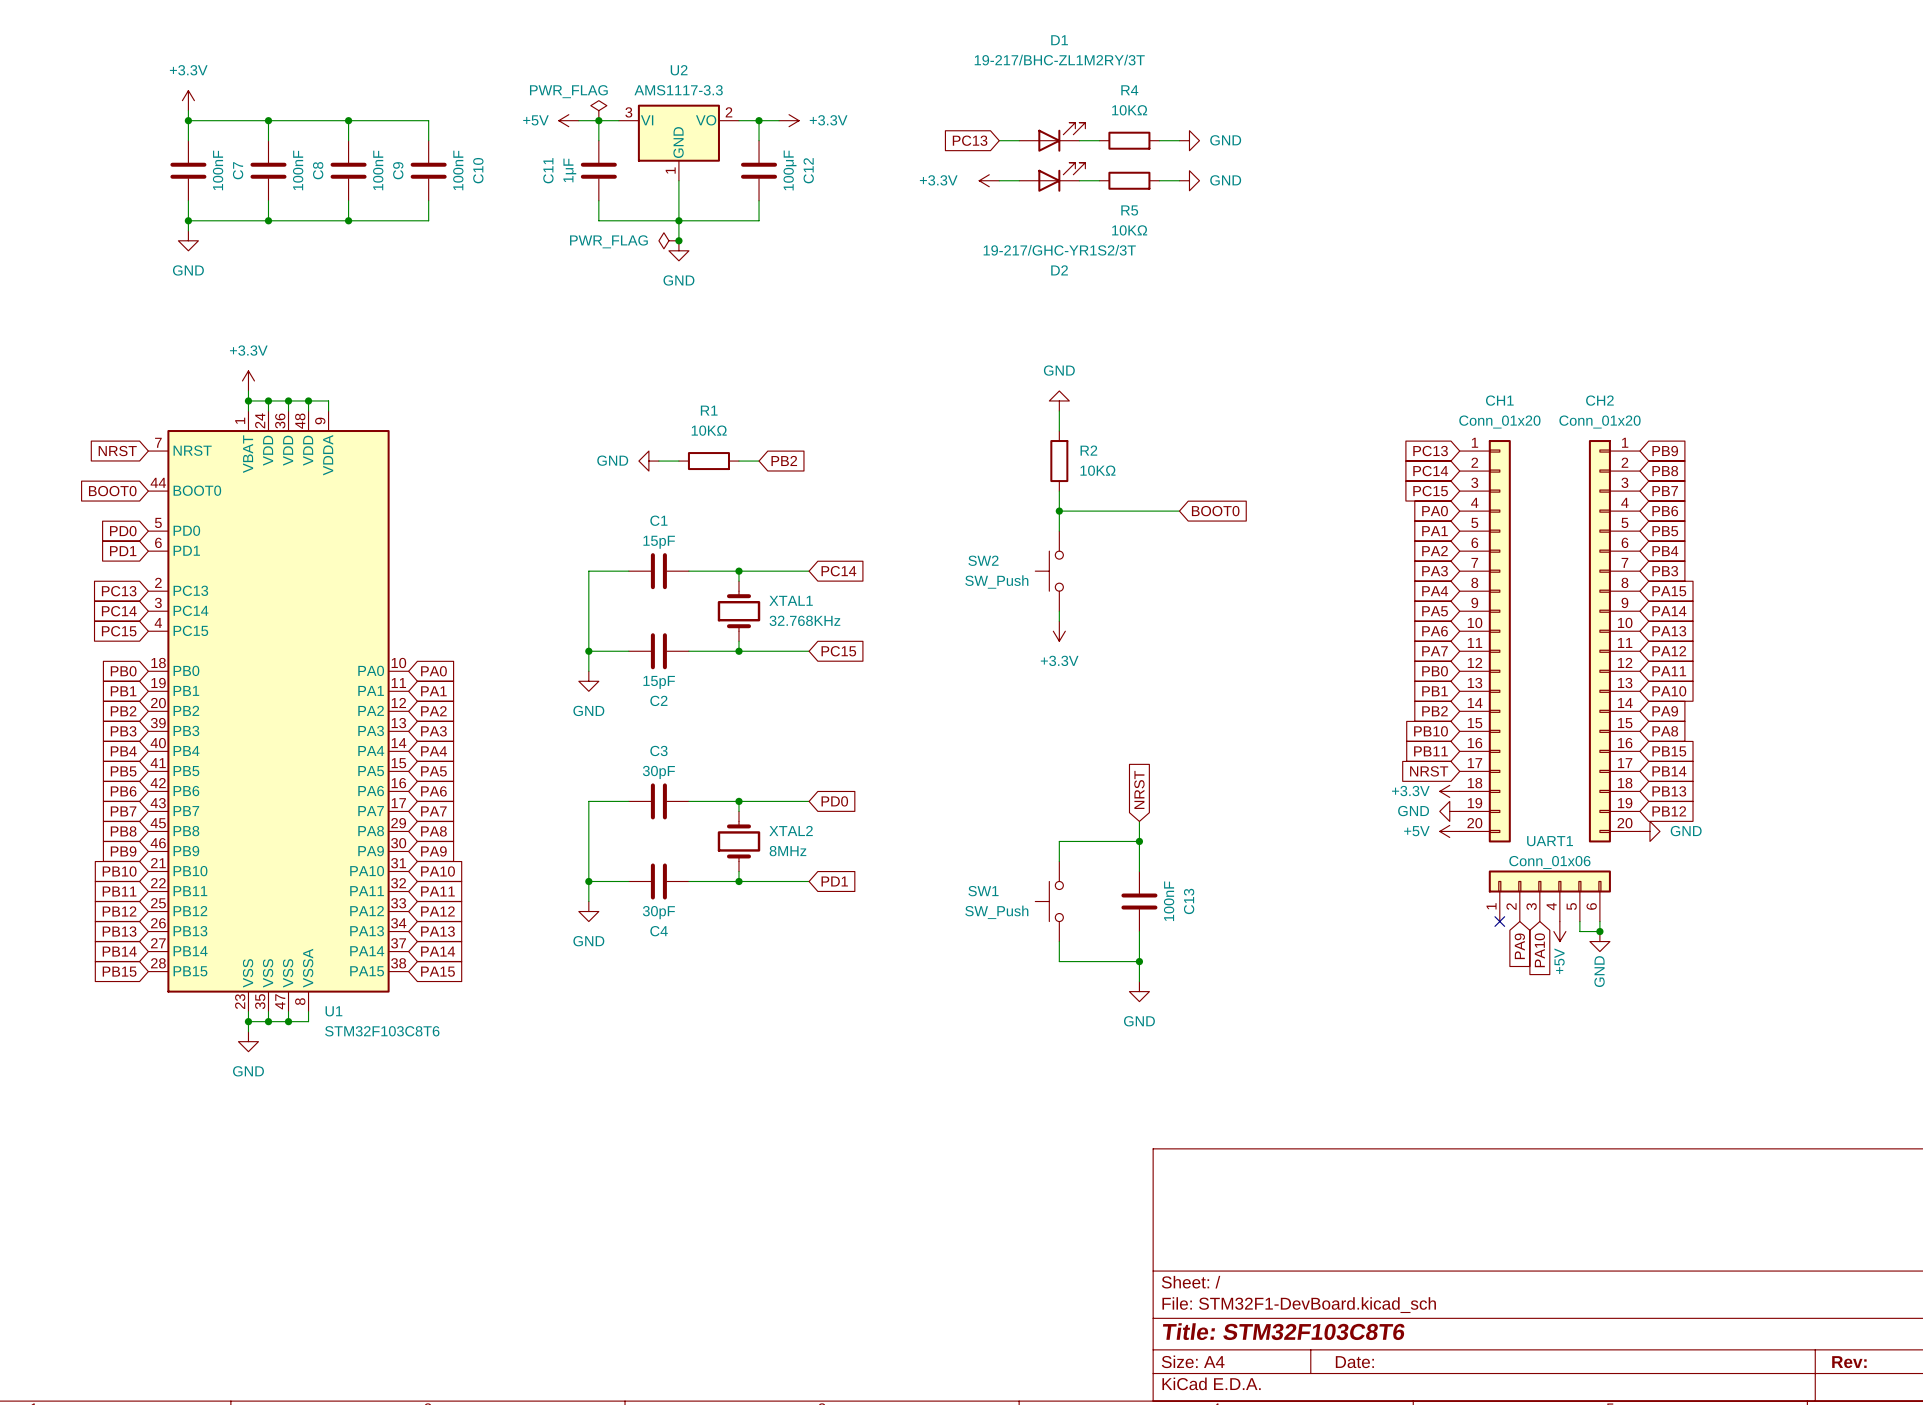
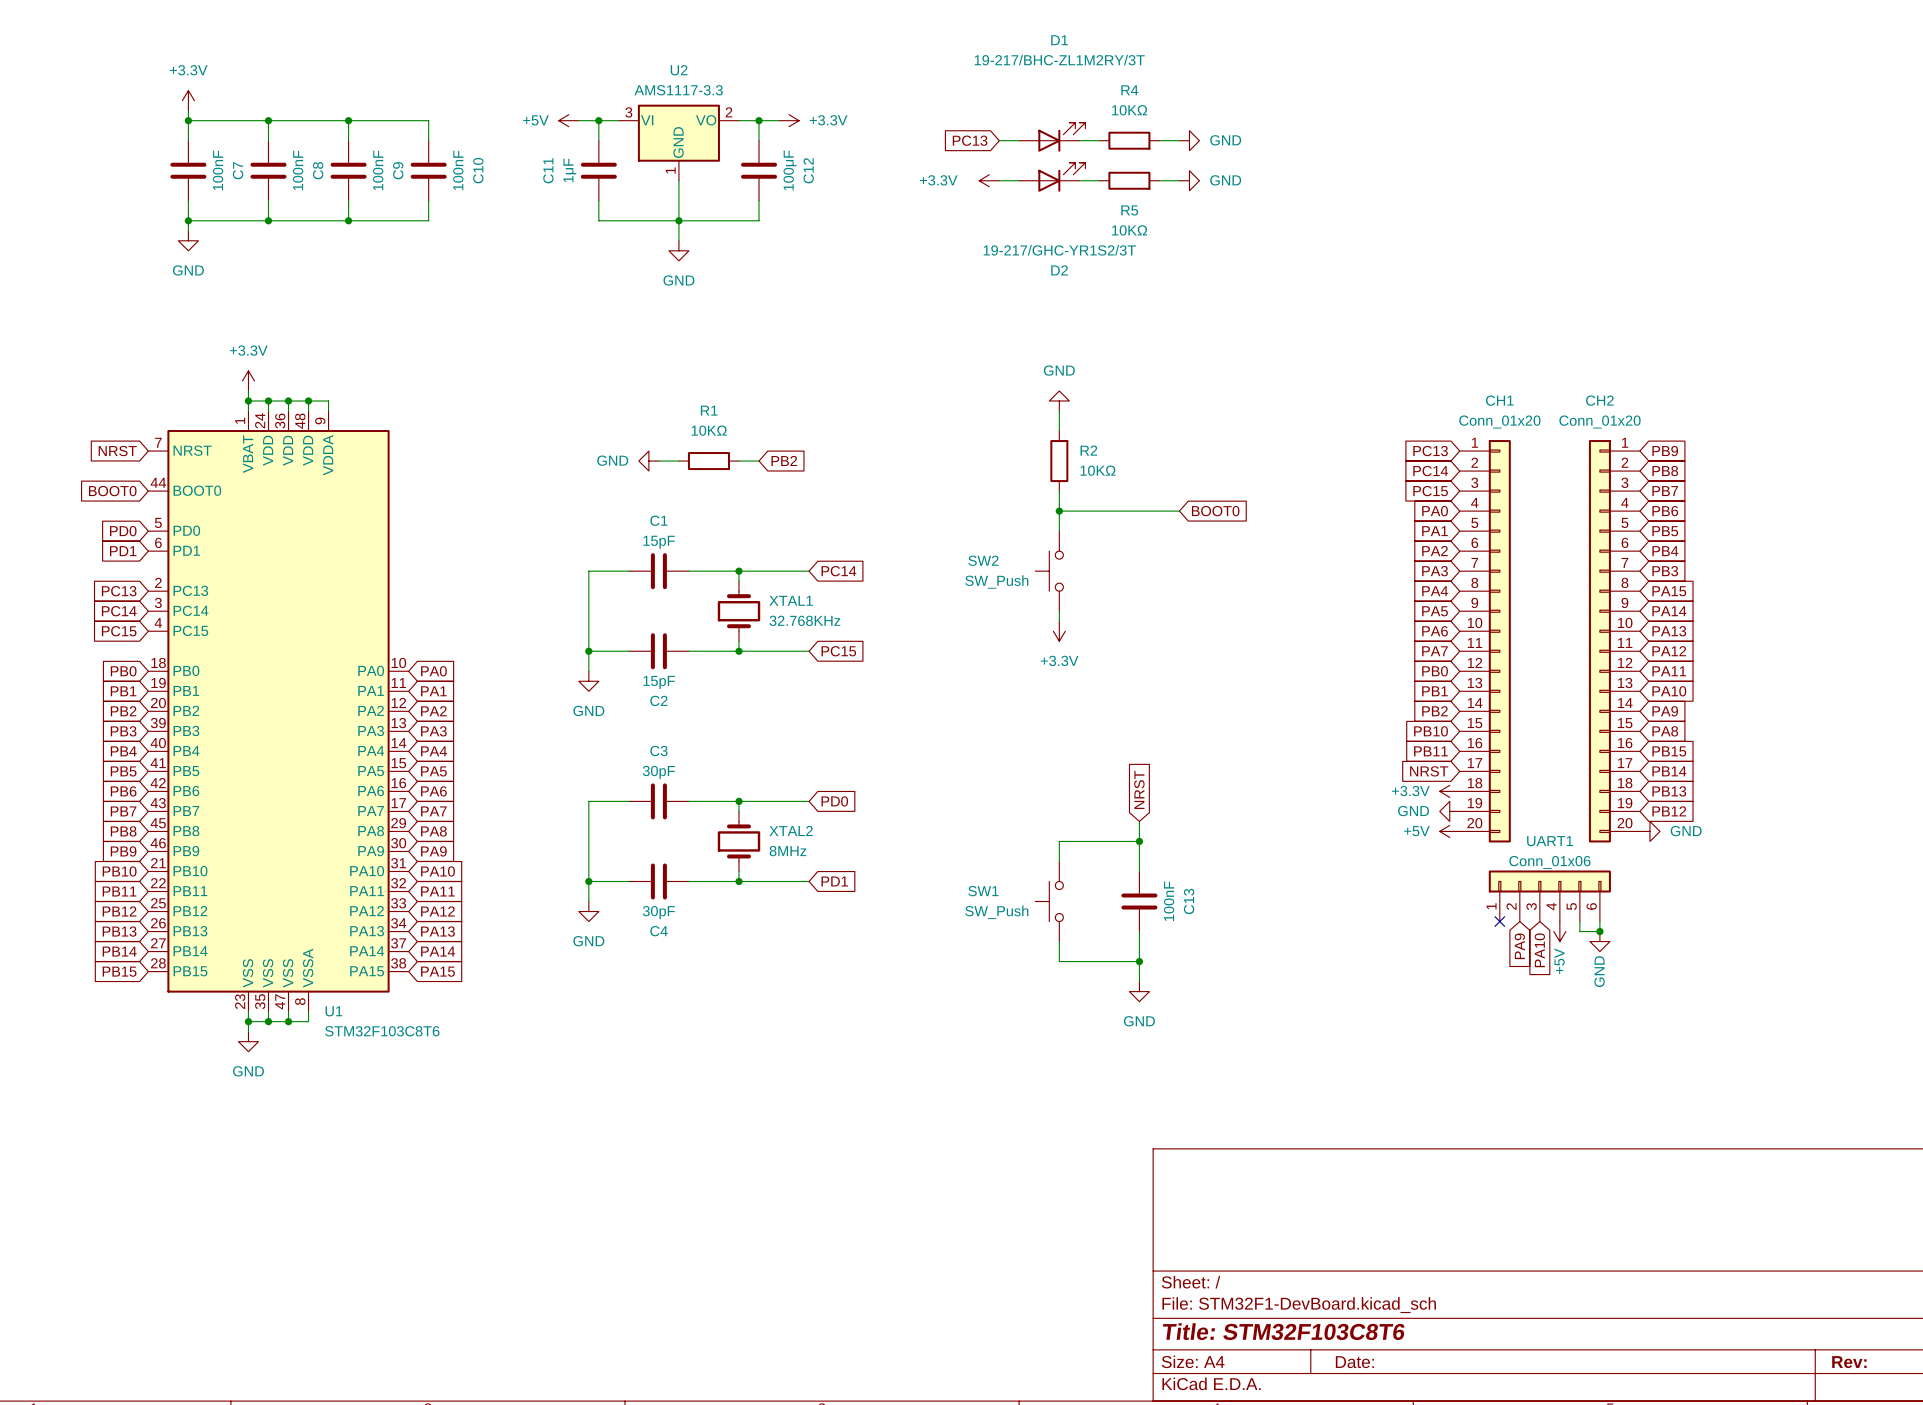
power symbol: PWR_FLAG (598, 110) -> none
power symbol: PWR_FLAG (668, 240) -> none
junction: (678, 240) -> none

